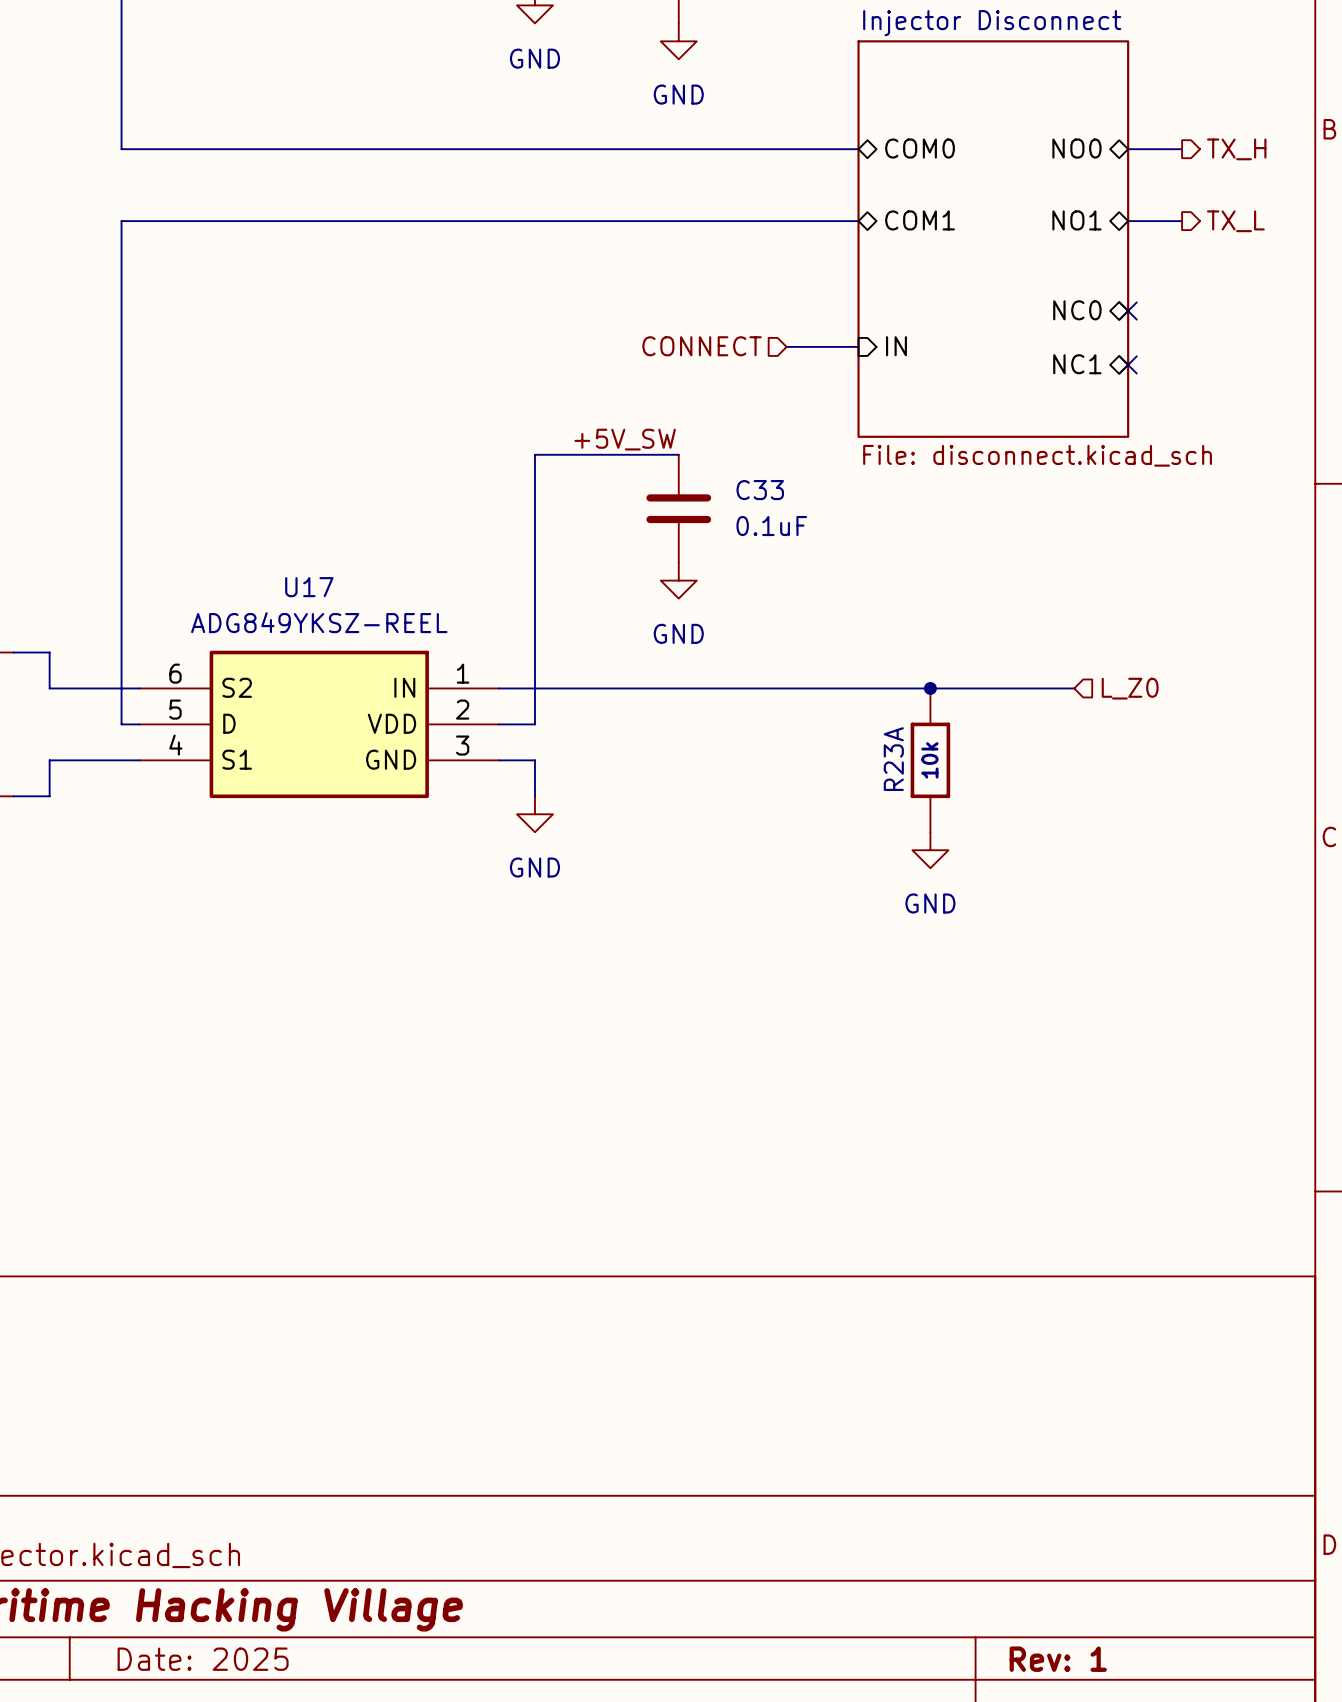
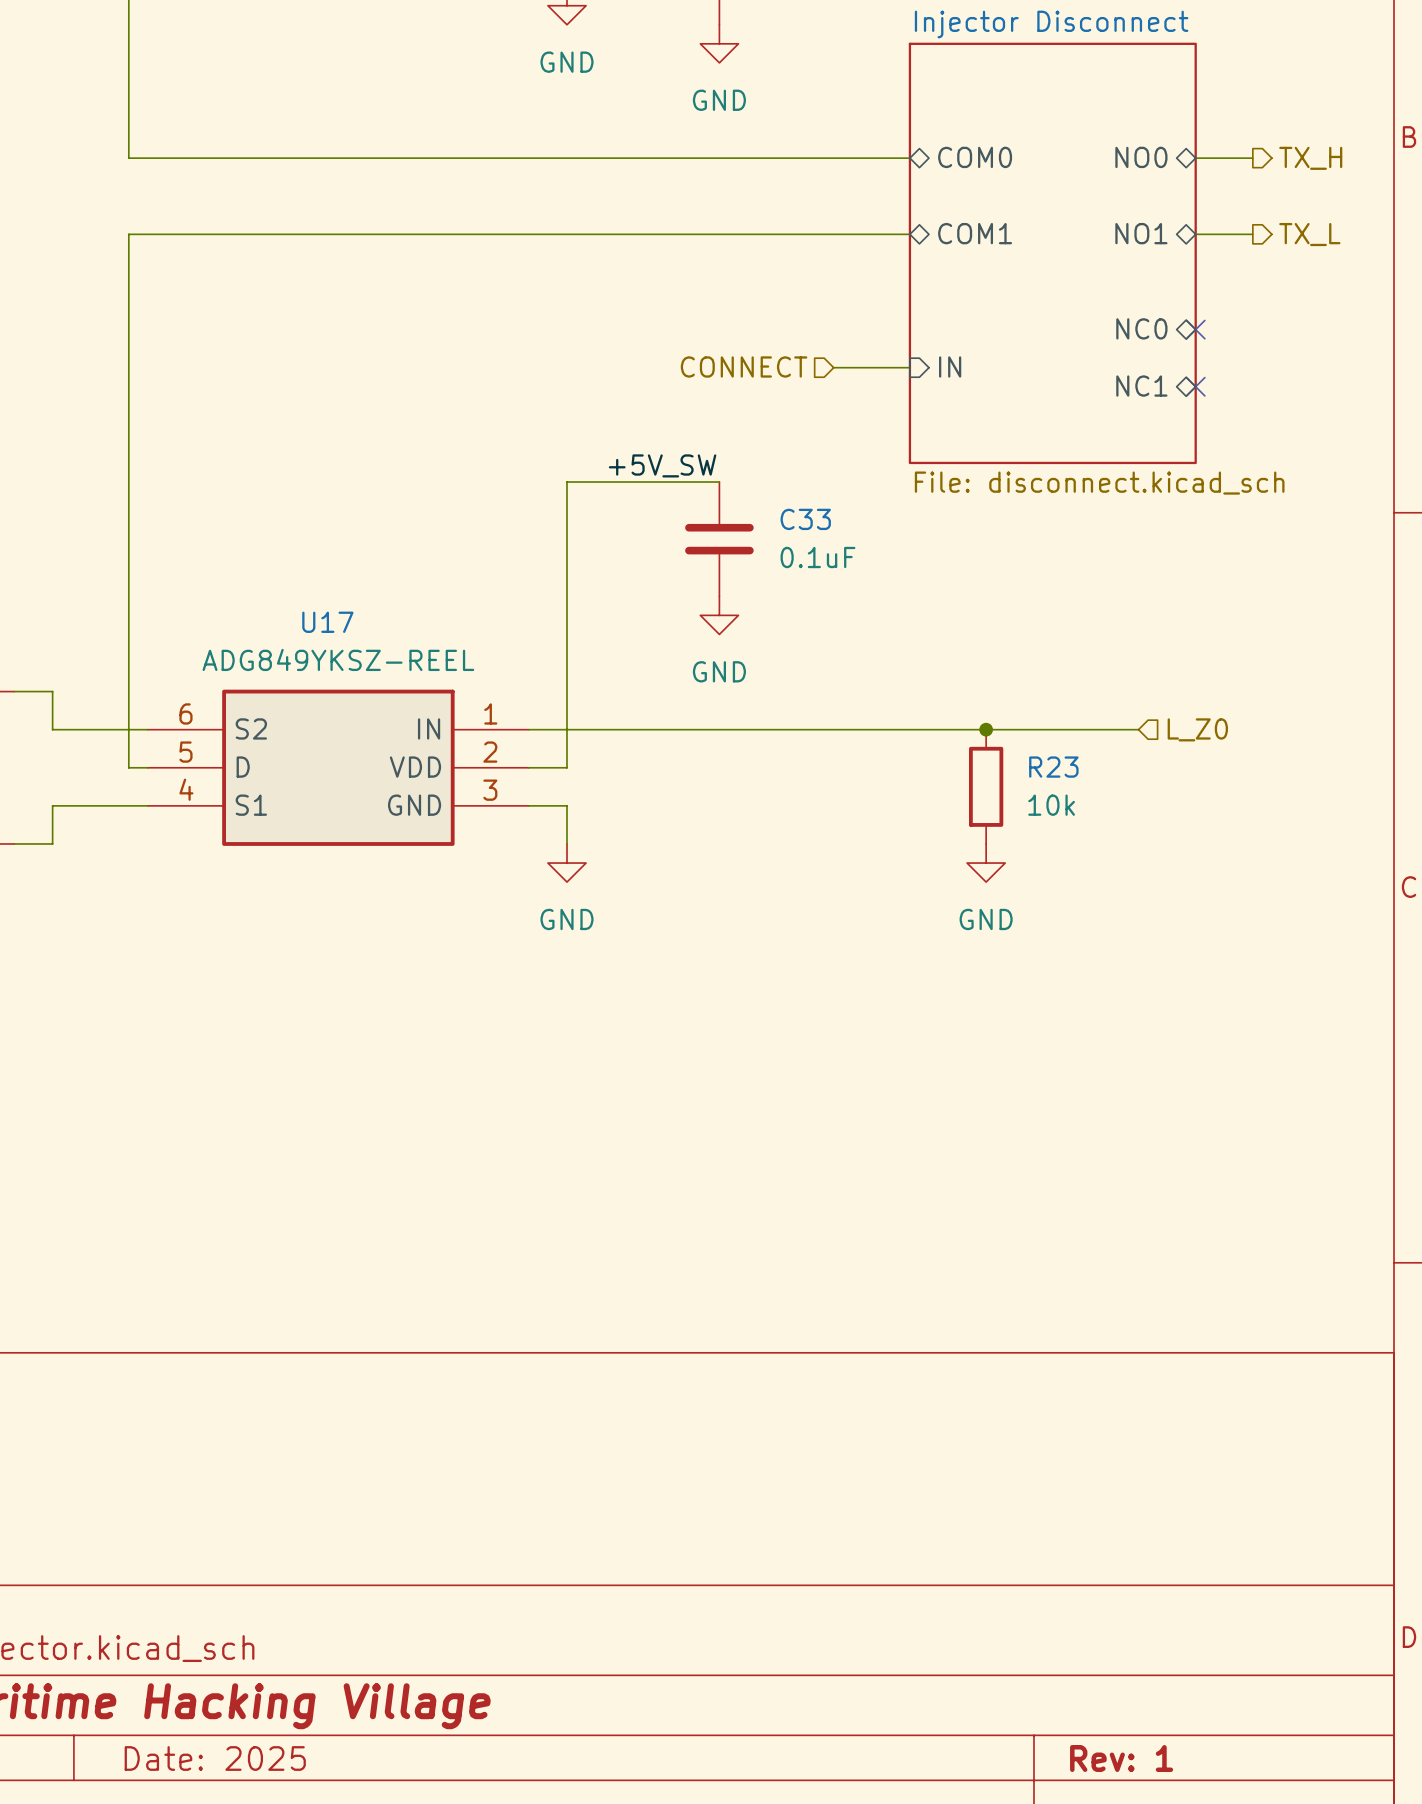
R23: none -> 10k (986, 786)
R23A: 10k (930, 760) -> none
power symbol position: GND (930, 850) -> GND (986, 863)

